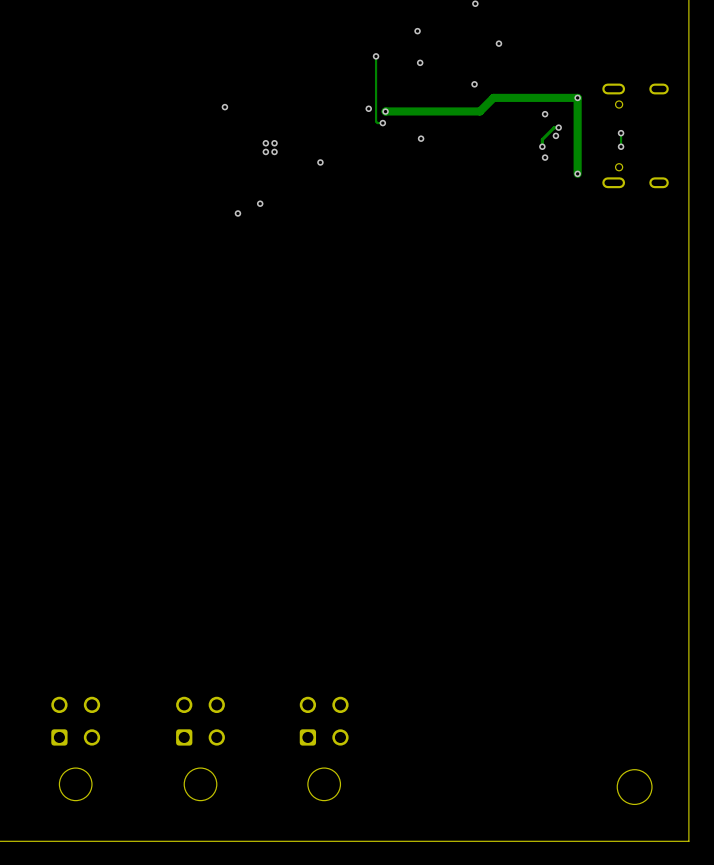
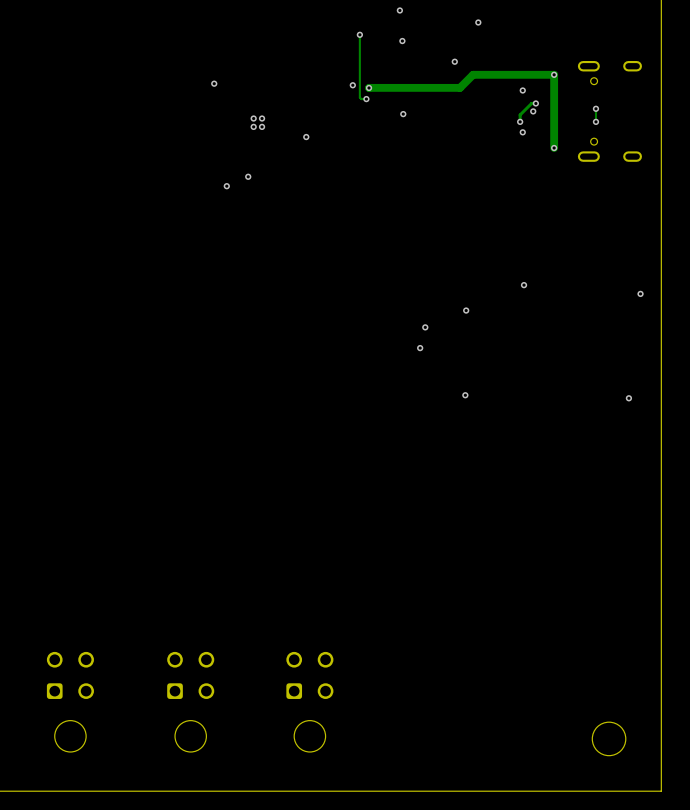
via: none -> (524, 285)
via: none -> (640, 293)
via: none -> (466, 310)
via: none -> (425, 327)
via: none -> (420, 348)
via: none -> (465, 395)
via: none -> (628, 398)

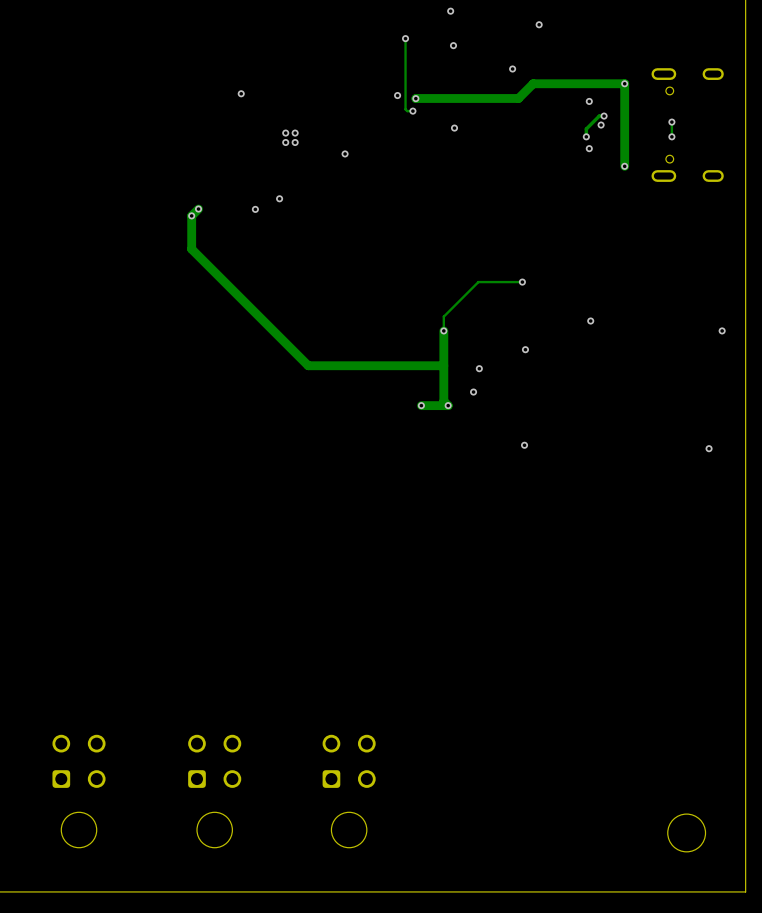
track: none -> (198, 209) (191, 215) (191, 249) (308, 365) (443, 365)
via: none -> (198, 209)
via: none -> (191, 215)
track: none -> (522, 282) (478, 282) (443, 316) (443, 401) (448, 405) (421, 405)
via: none -> (522, 282)
via: none -> (443, 330)
via: none -> (421, 405)
via: none -> (448, 405)

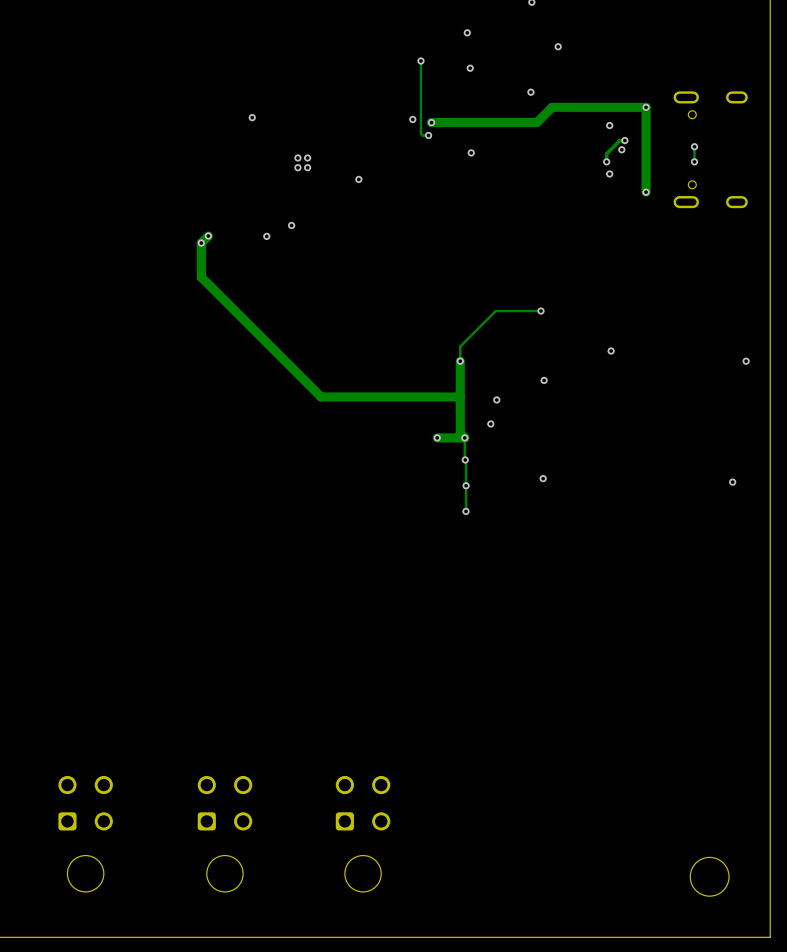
track: none -> (464, 437) (466, 511)
via: none -> (465, 459)
via: none -> (466, 485)
via: none -> (465, 511)

